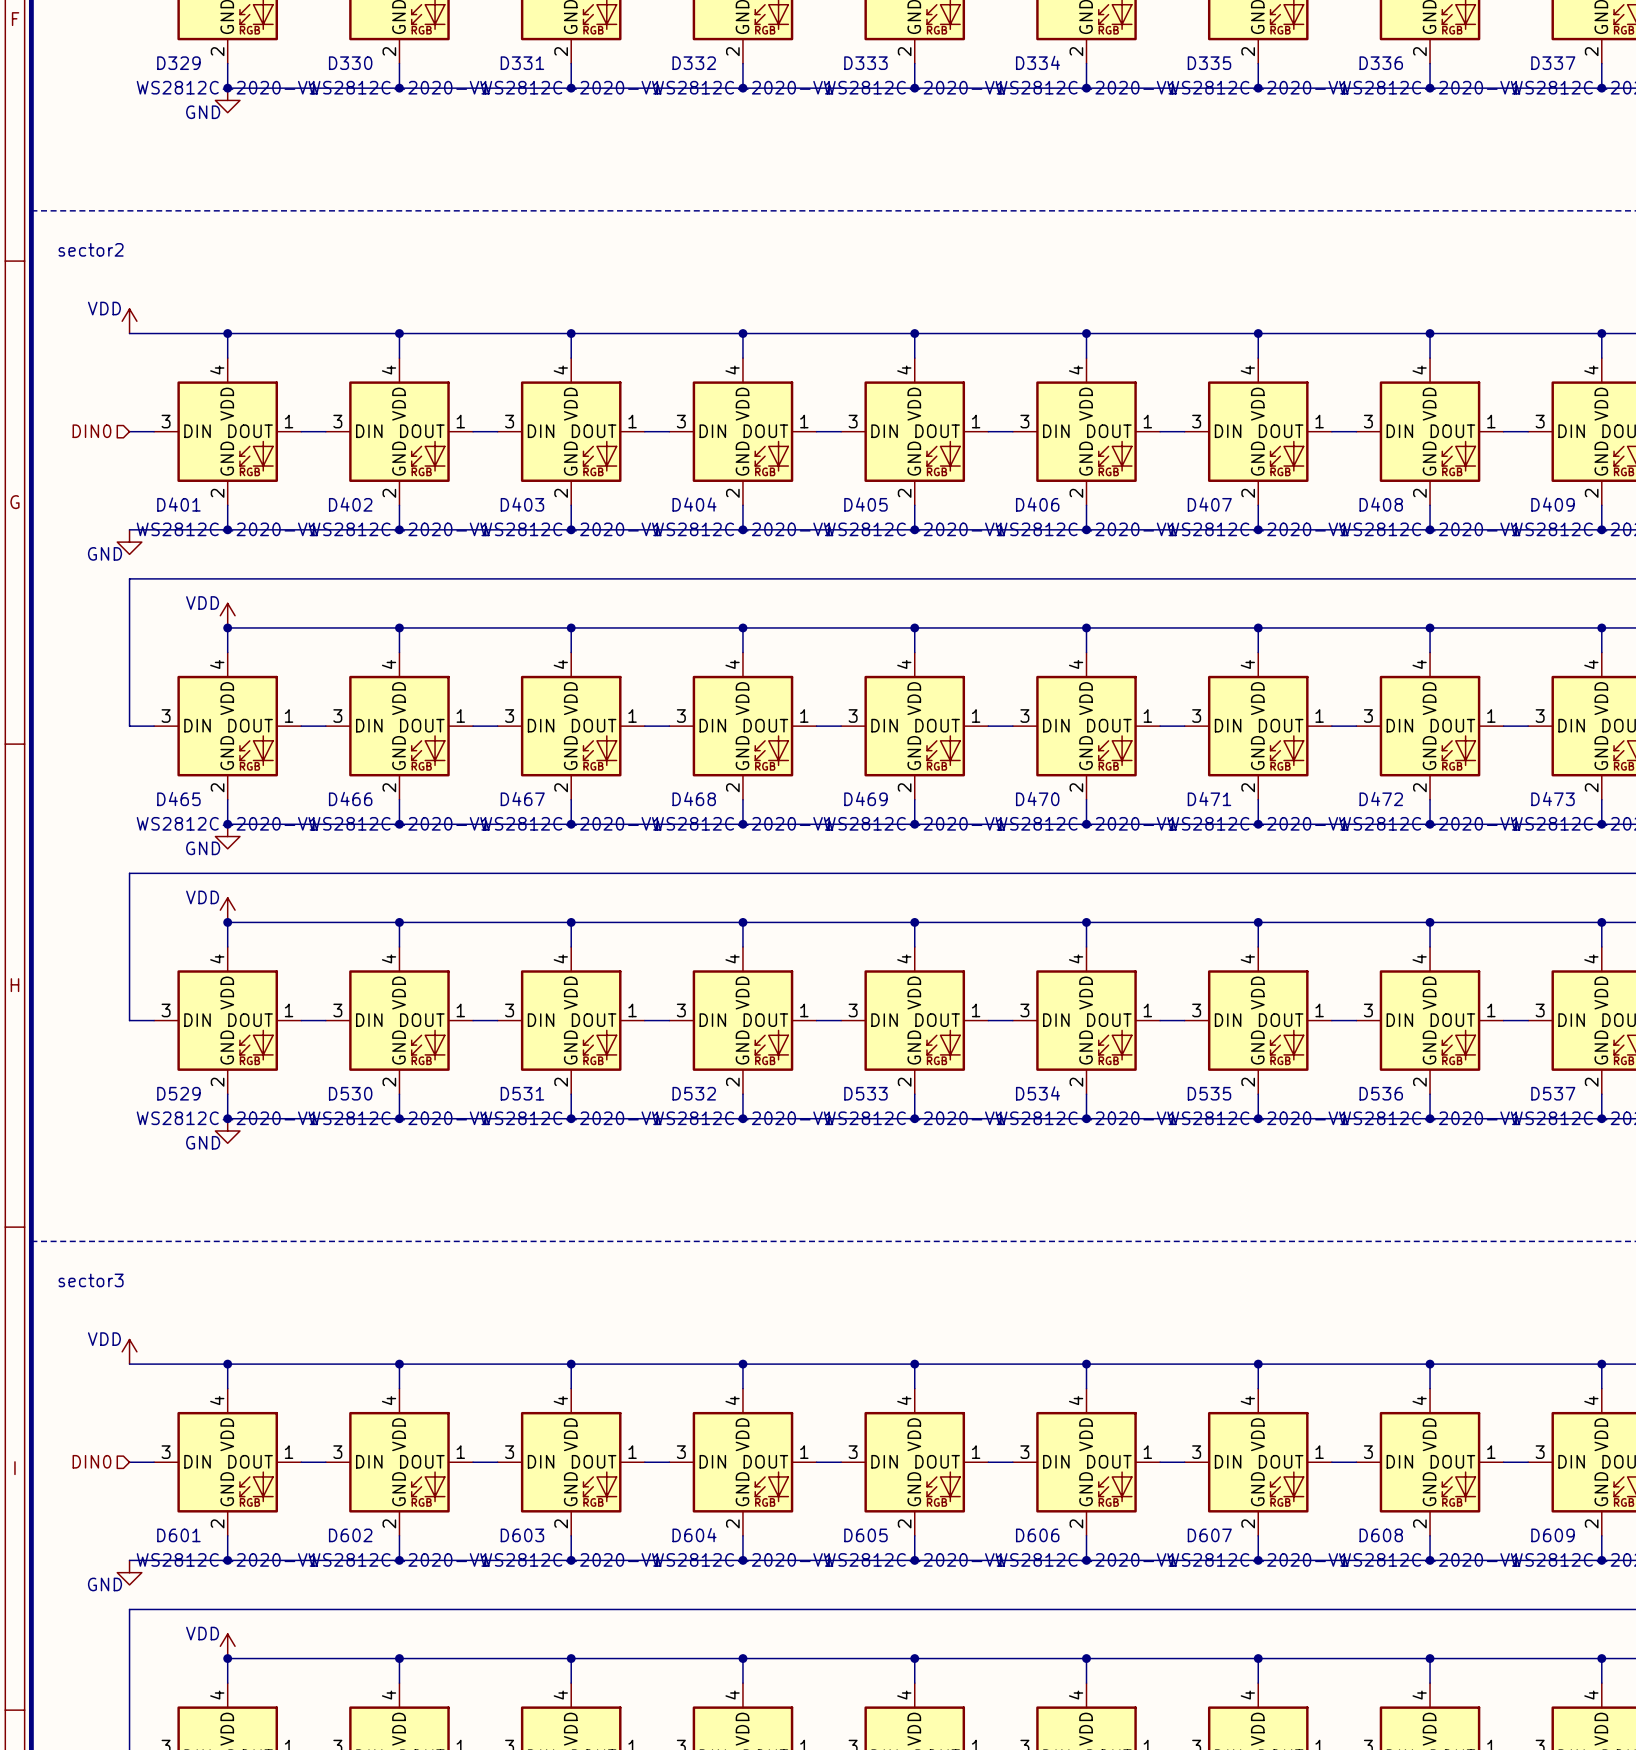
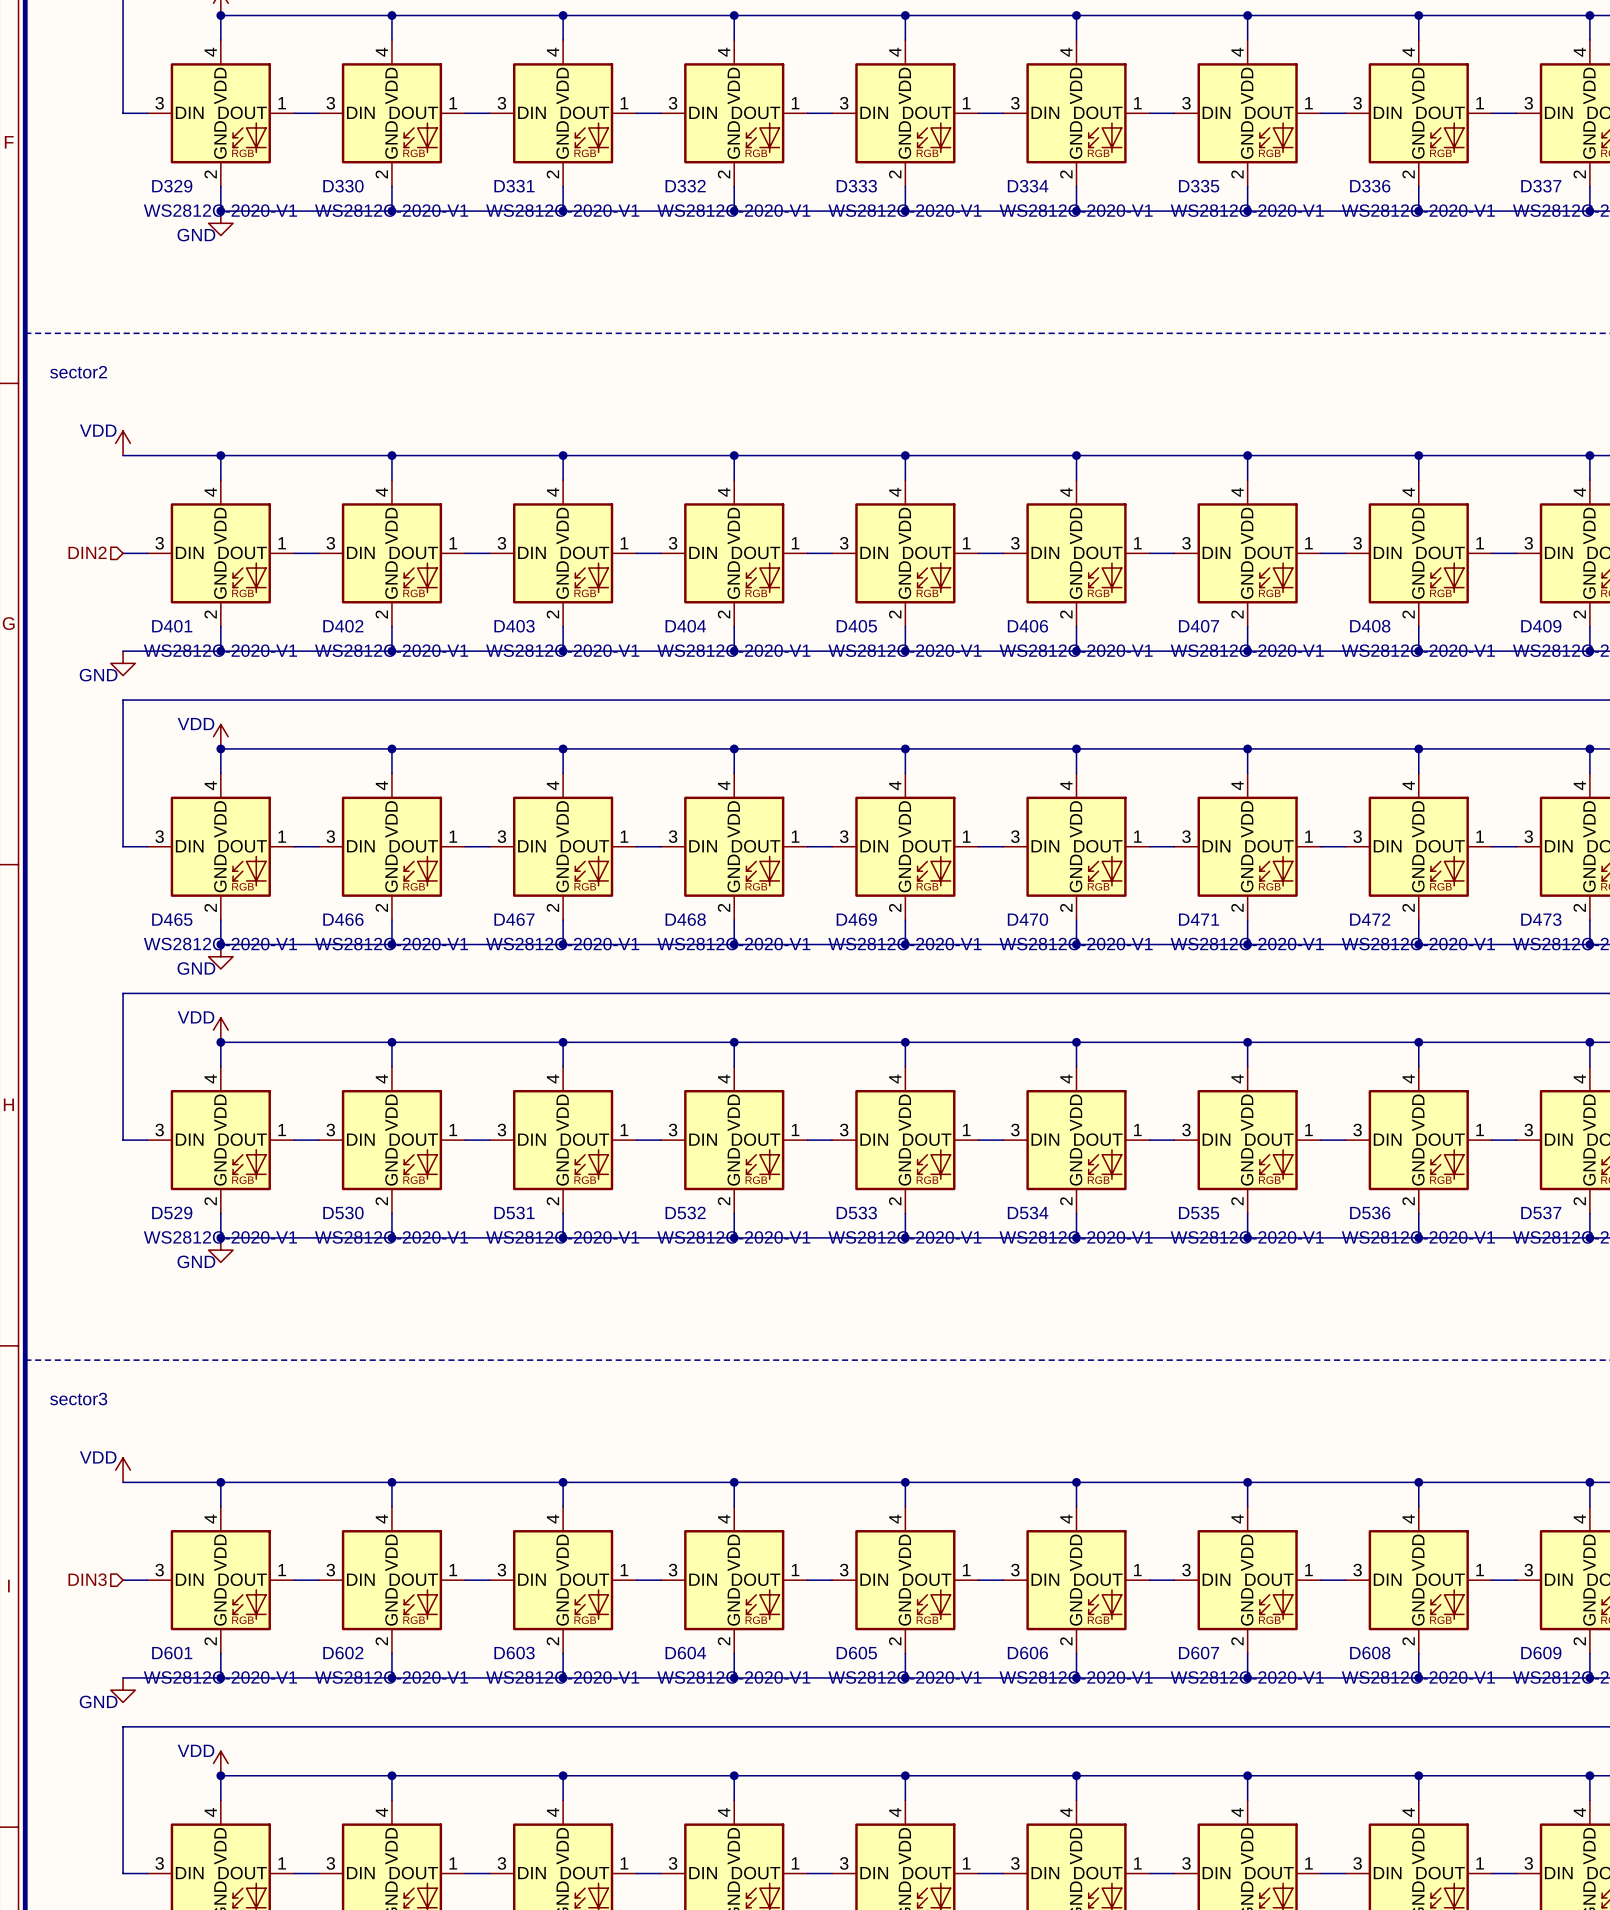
hierarchical label: DIN0 (91, 431) -> DIN2 (87, 552)
hierarchical label: DIN0 (91, 1461) -> DIN3 (87, 1579)

